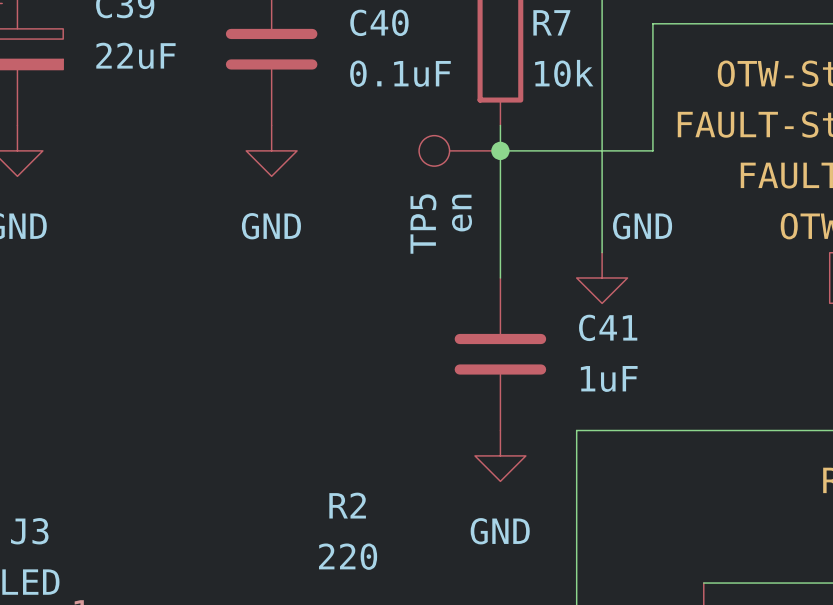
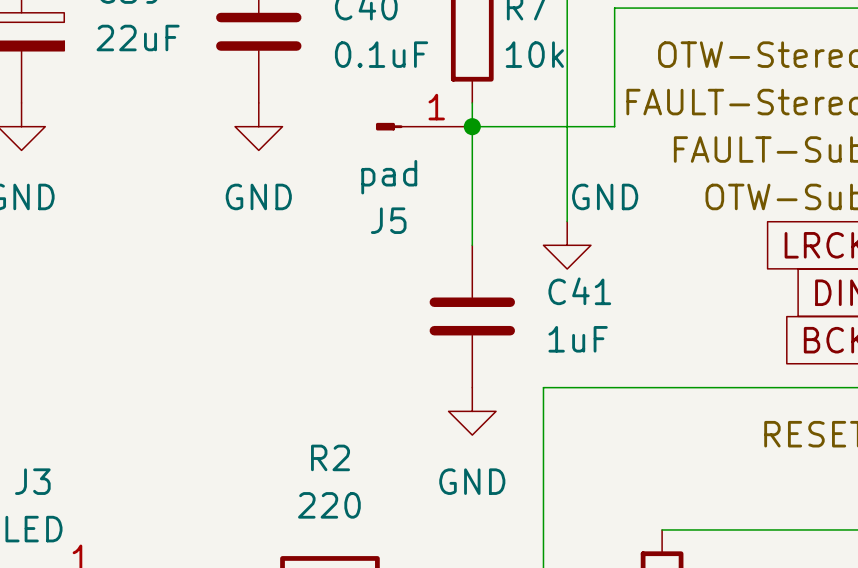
J5: none -> pad (424, 126)
TP5: en (459, 150) -> none

